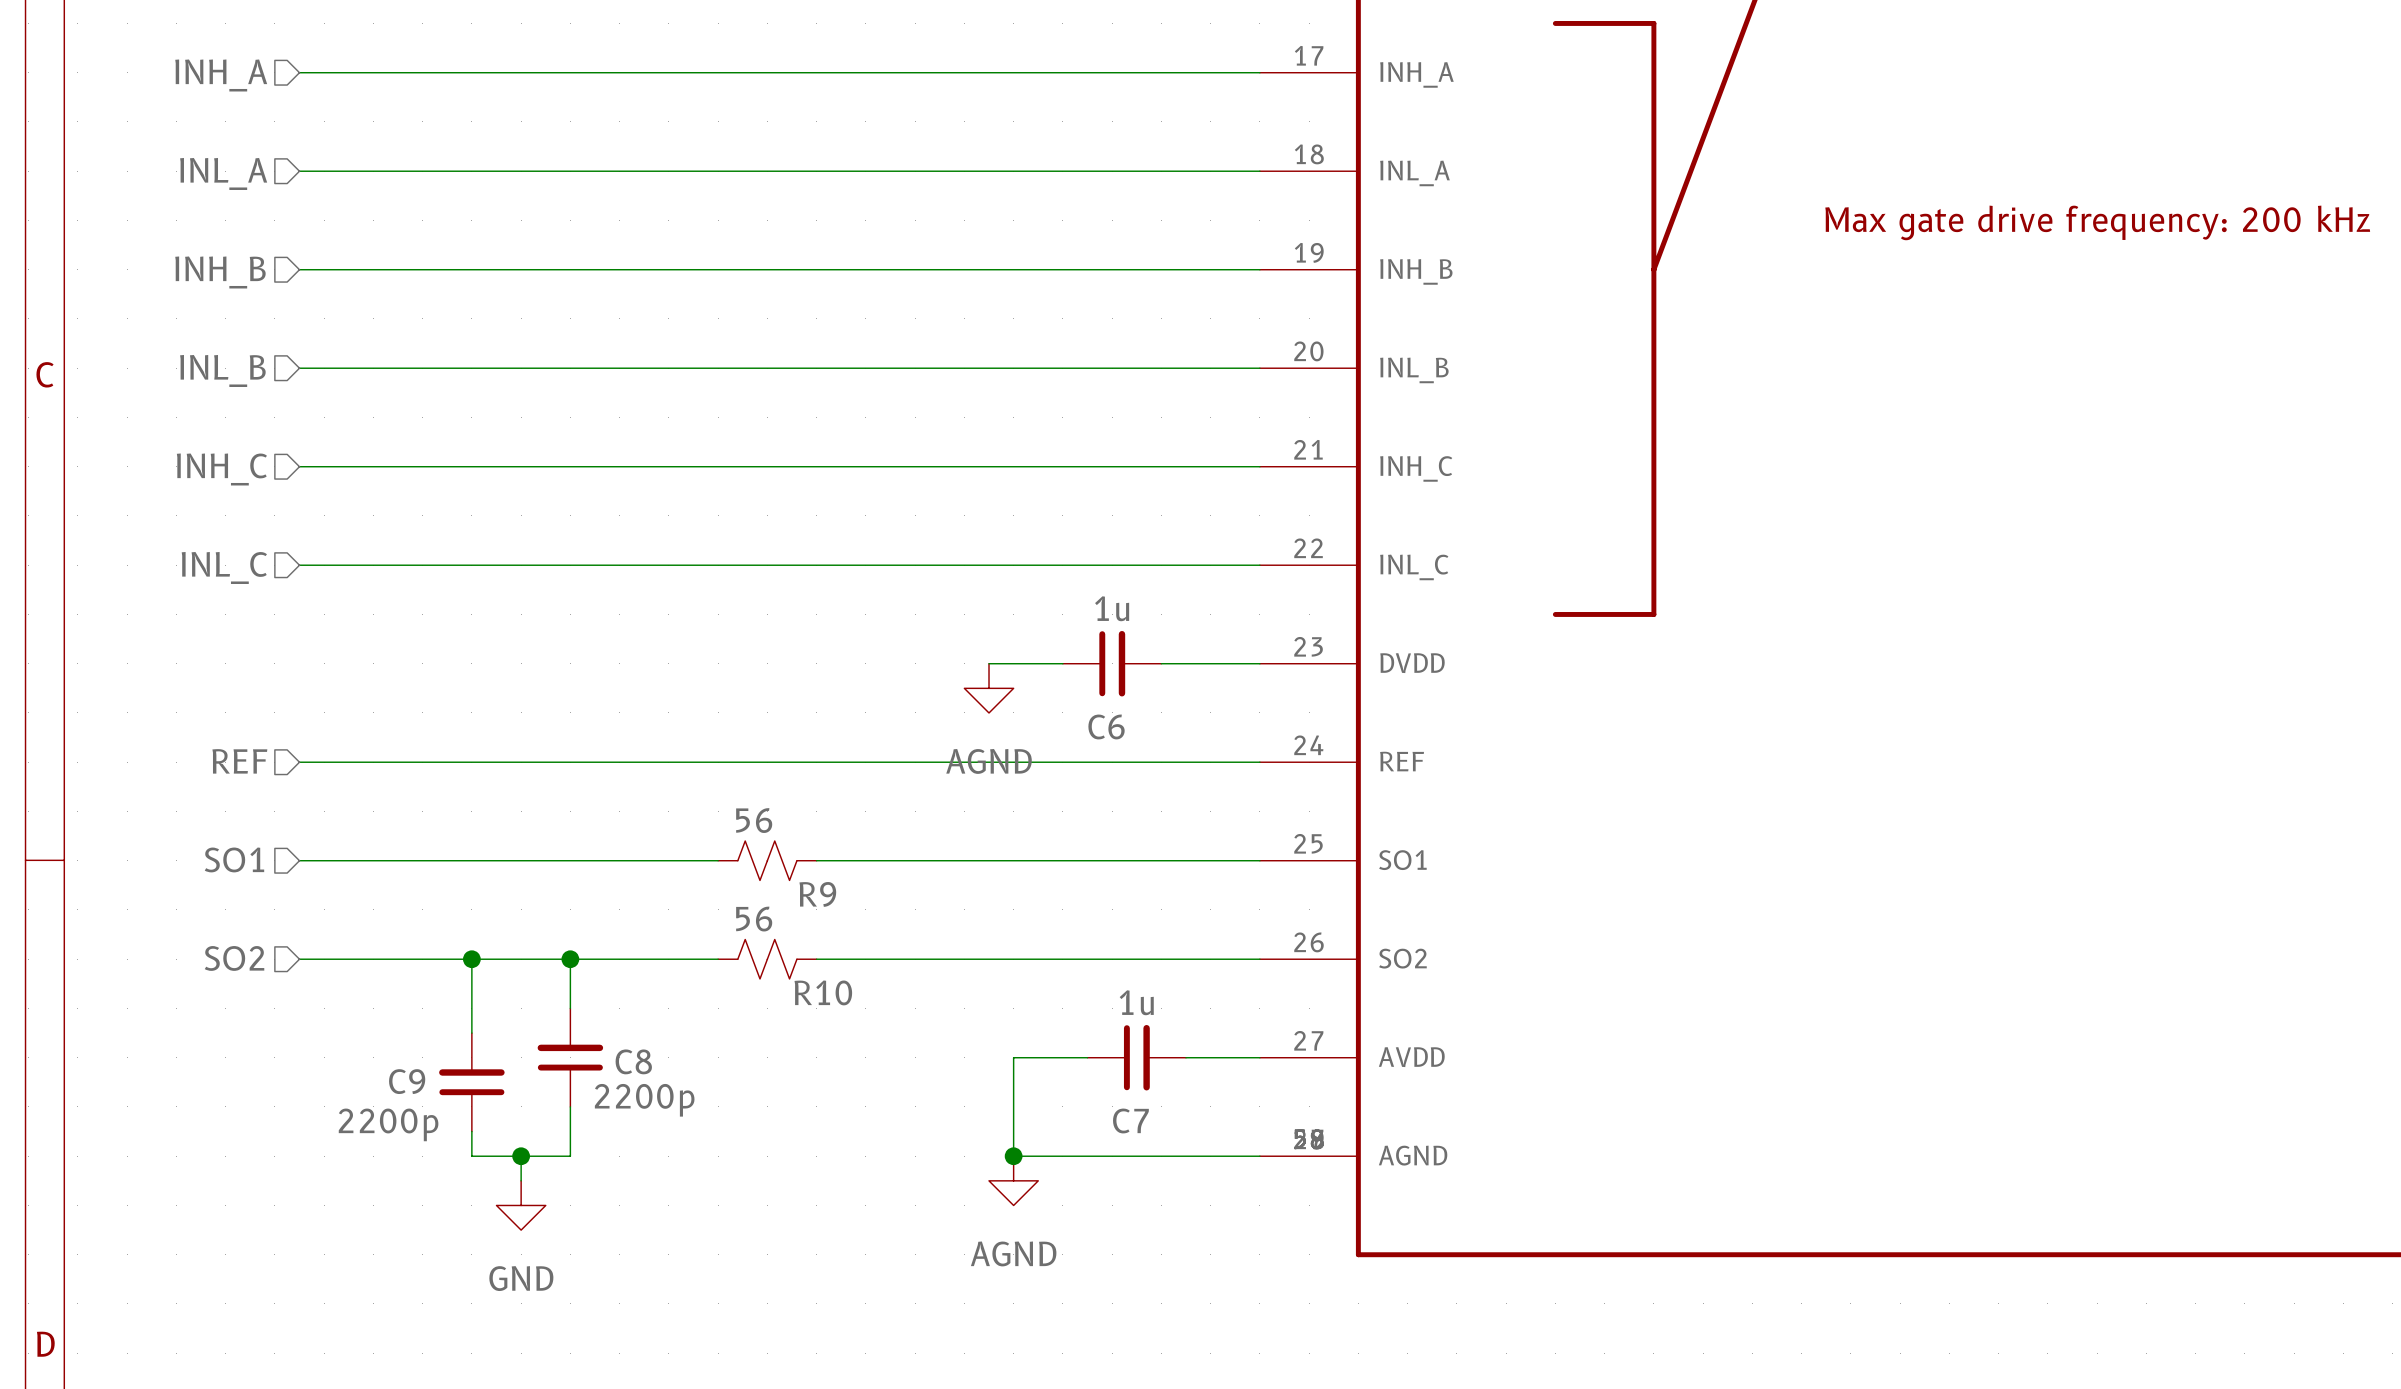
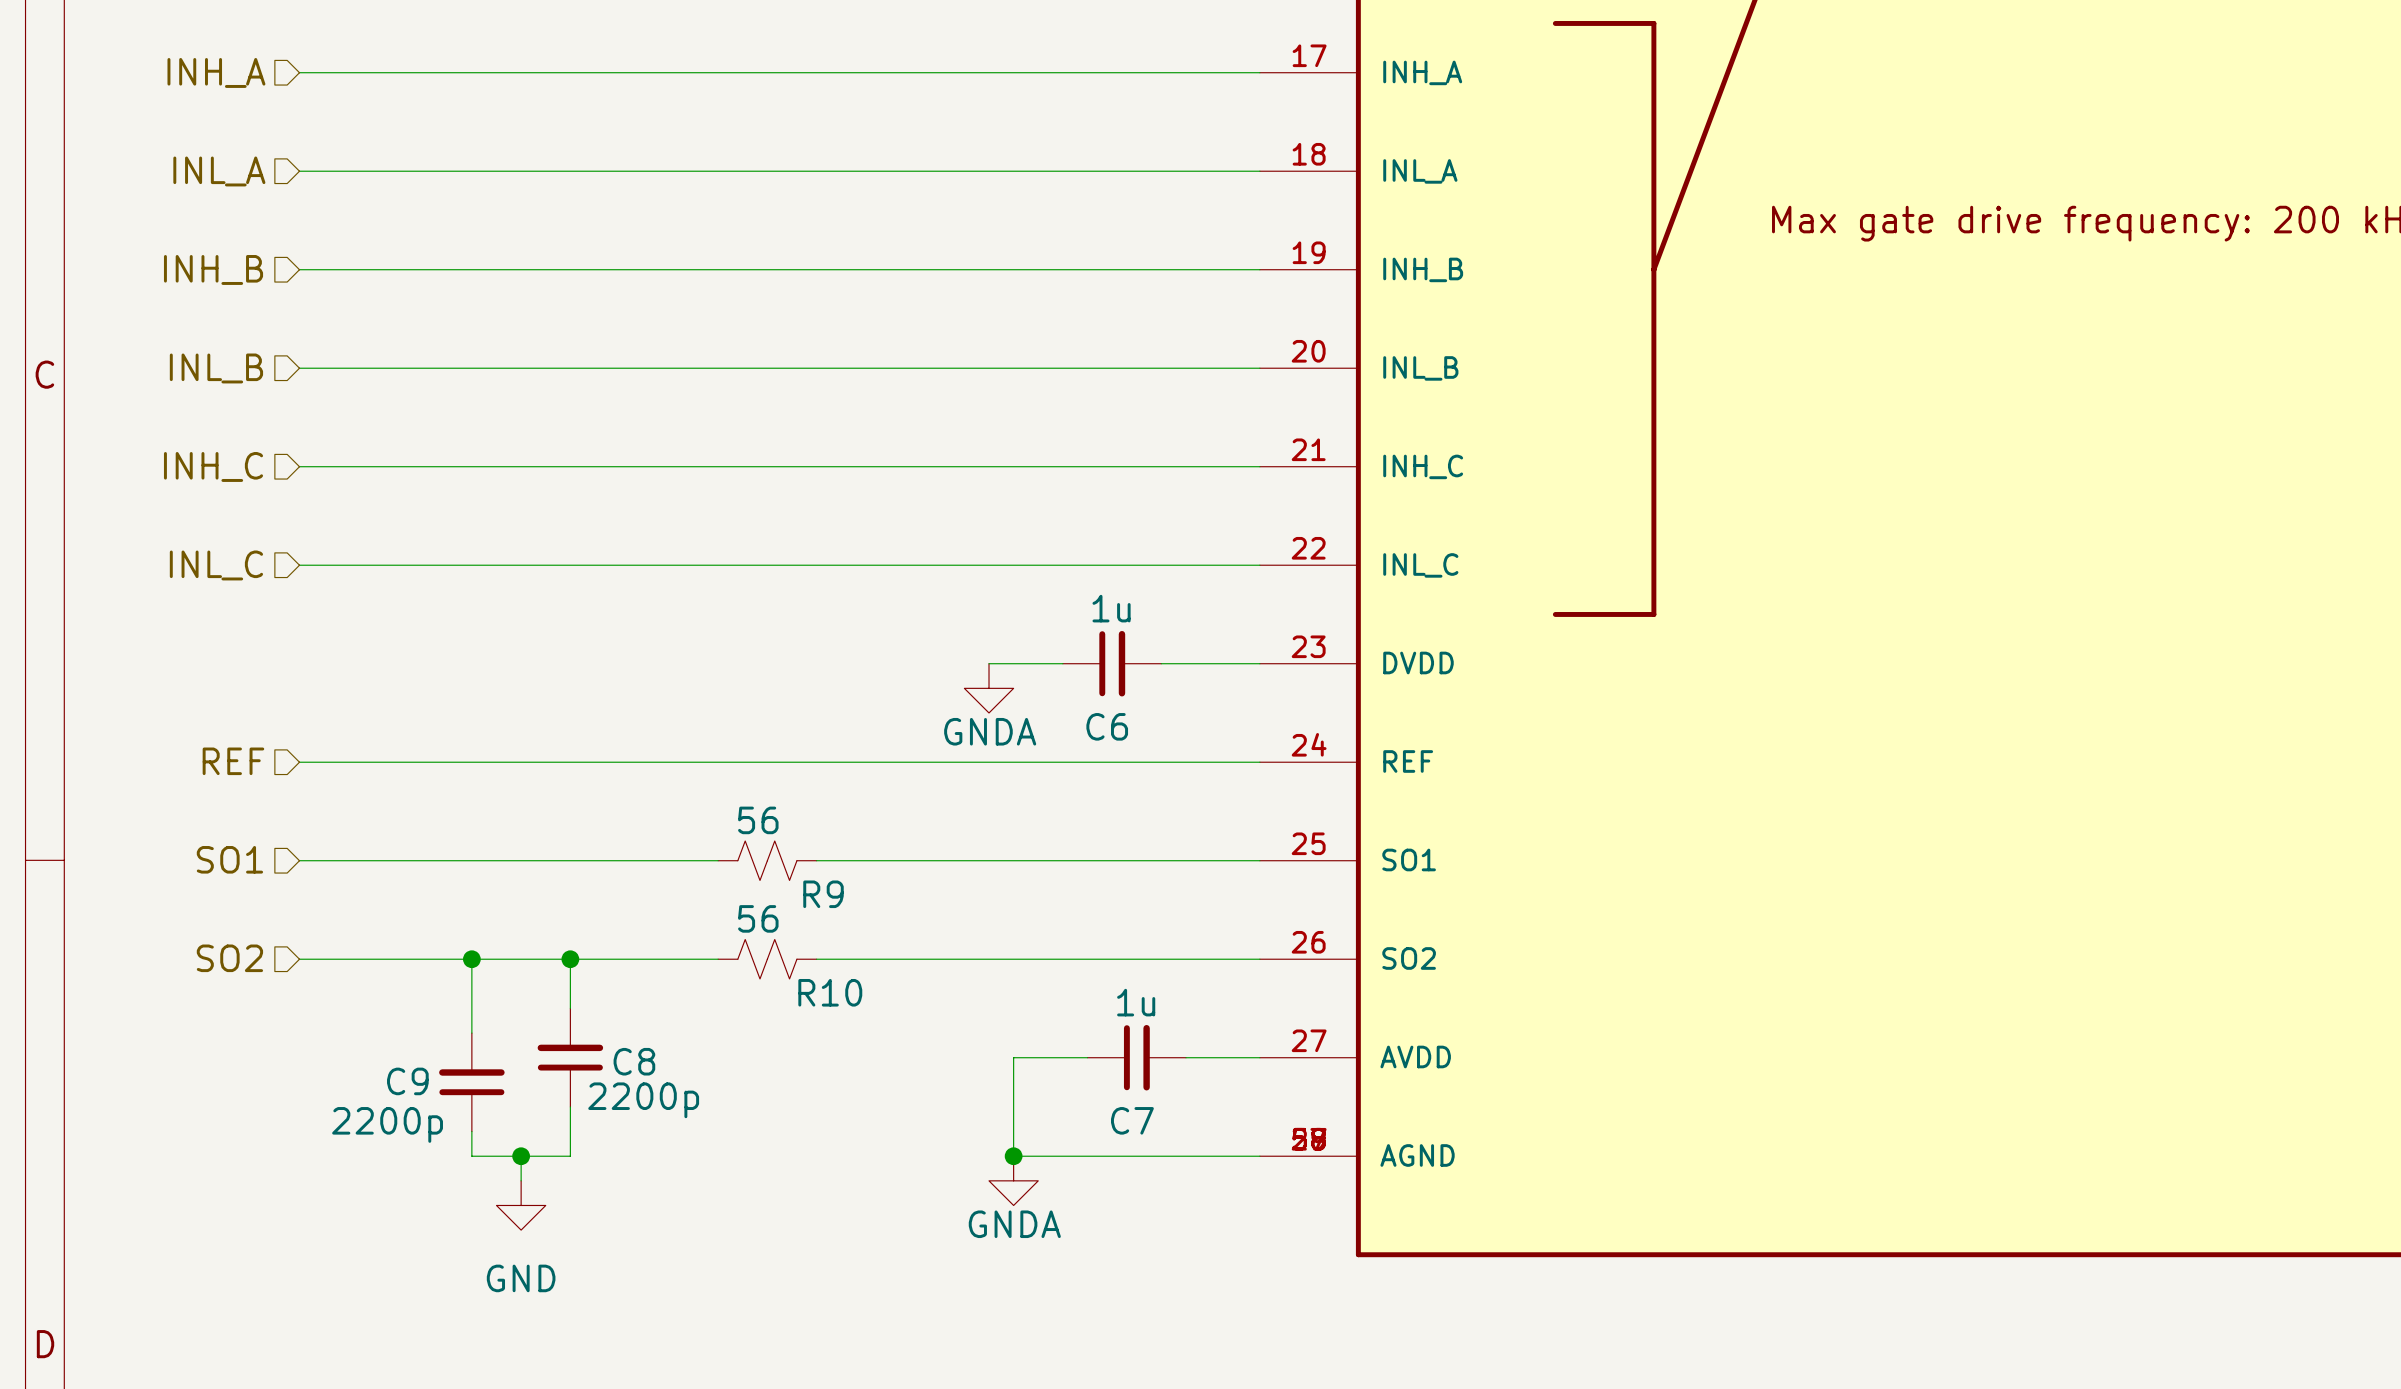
power symbol: AGND (989, 688) -> GNDA (989, 688)
power symbol: AGND (1013, 1180) -> GNDA (1013, 1180)

